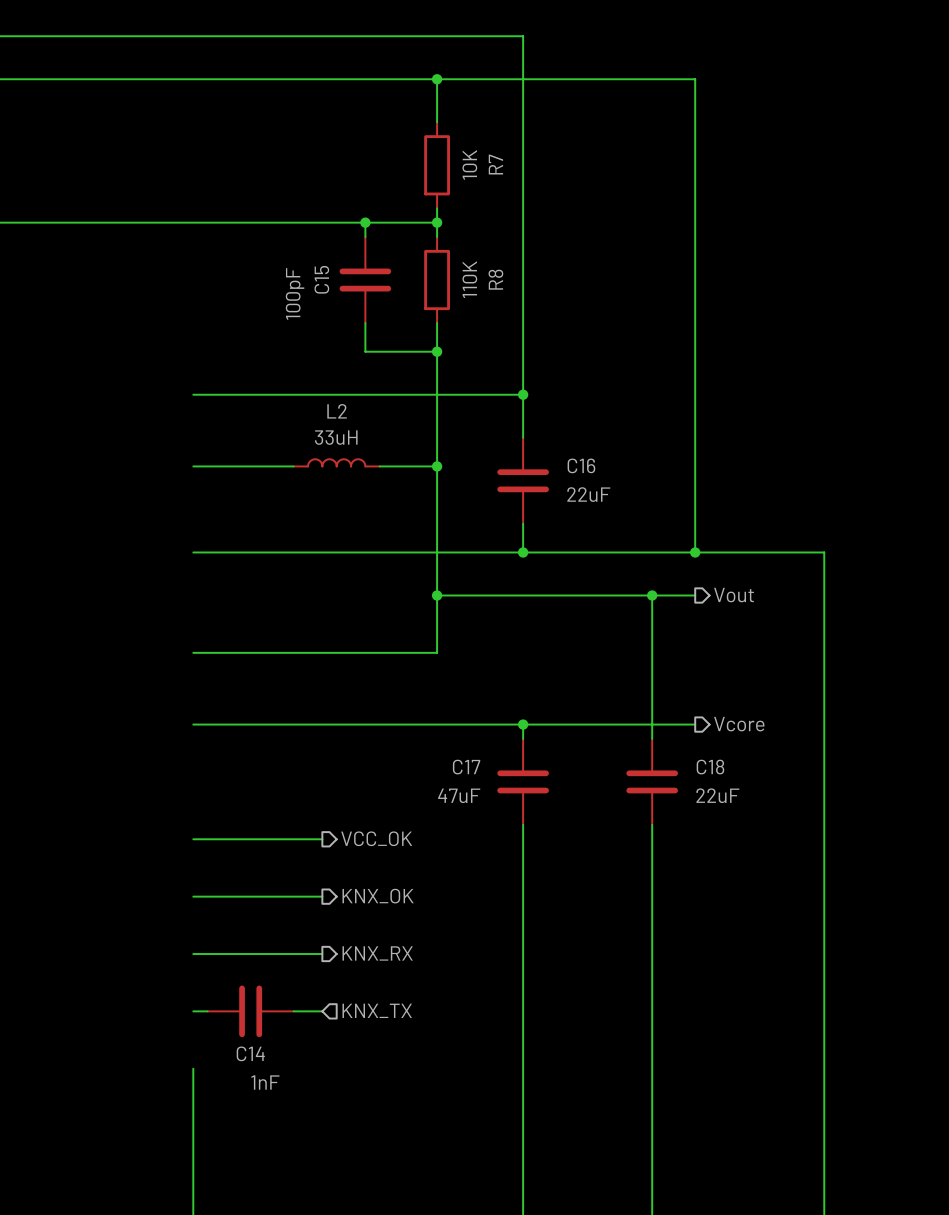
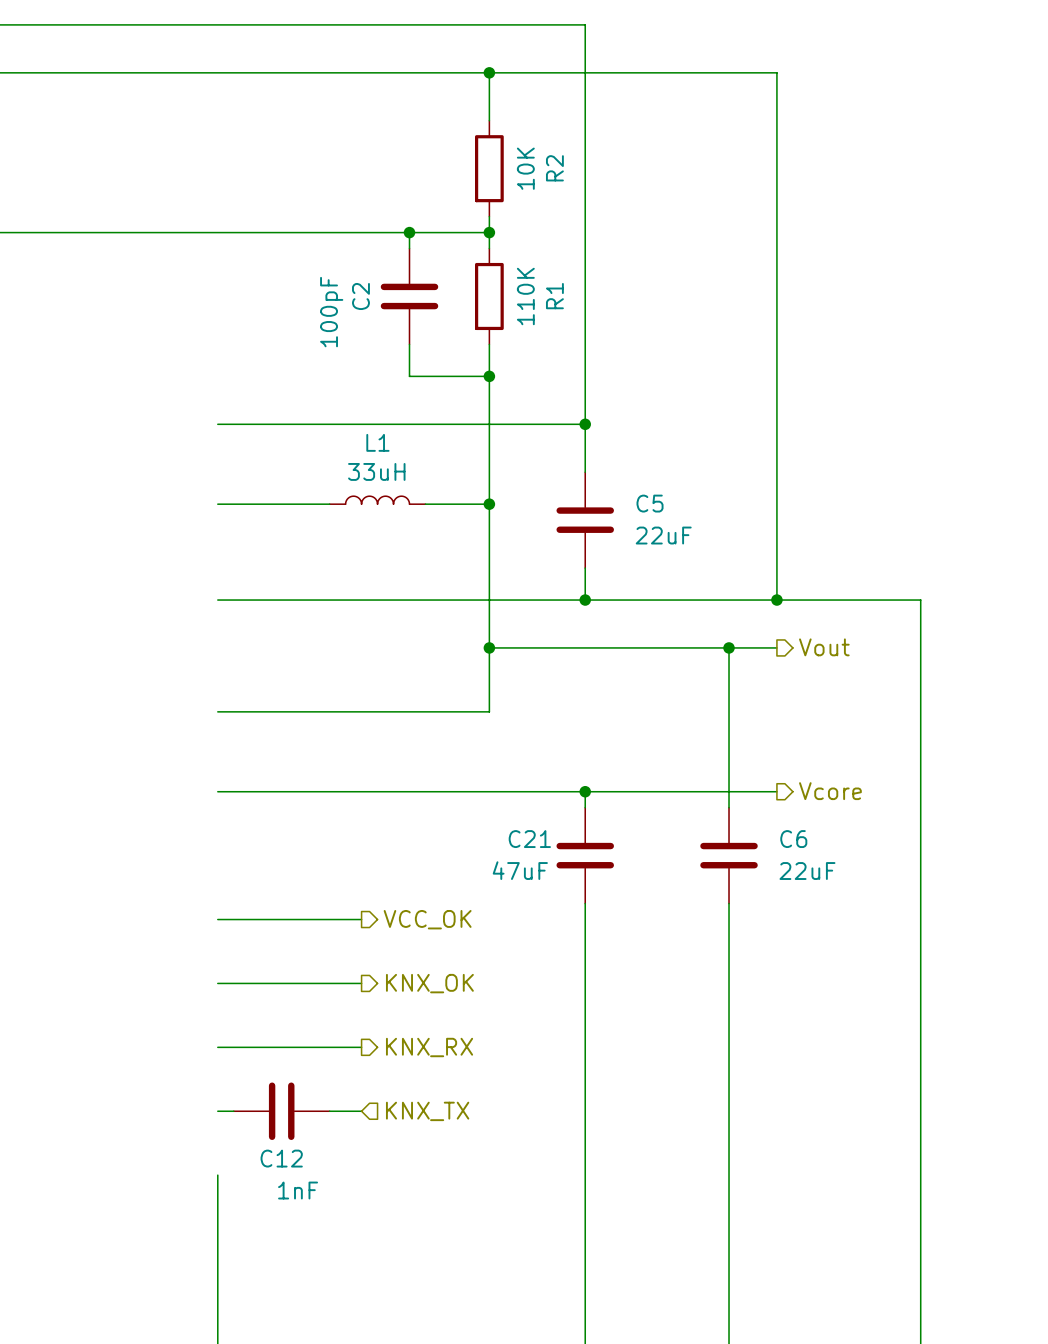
R7 name: R7 (495, 164) -> R2 (554, 168)
C15 name: C15 (321, 279) -> C2 (360, 296)
R8 name: R8 (495, 279) -> R1 (554, 296)
L2 name: L2 (337, 411) -> L1 (377, 442)
C16 name: C16 (581, 465) -> C5 (650, 503)
C17 name: C17 (466, 767) -> C21 (529, 839)
C18 name: C18 (710, 767) -> C6 (793, 839)
C14 name: C14 (250, 1053) -> C12 (281, 1158)

